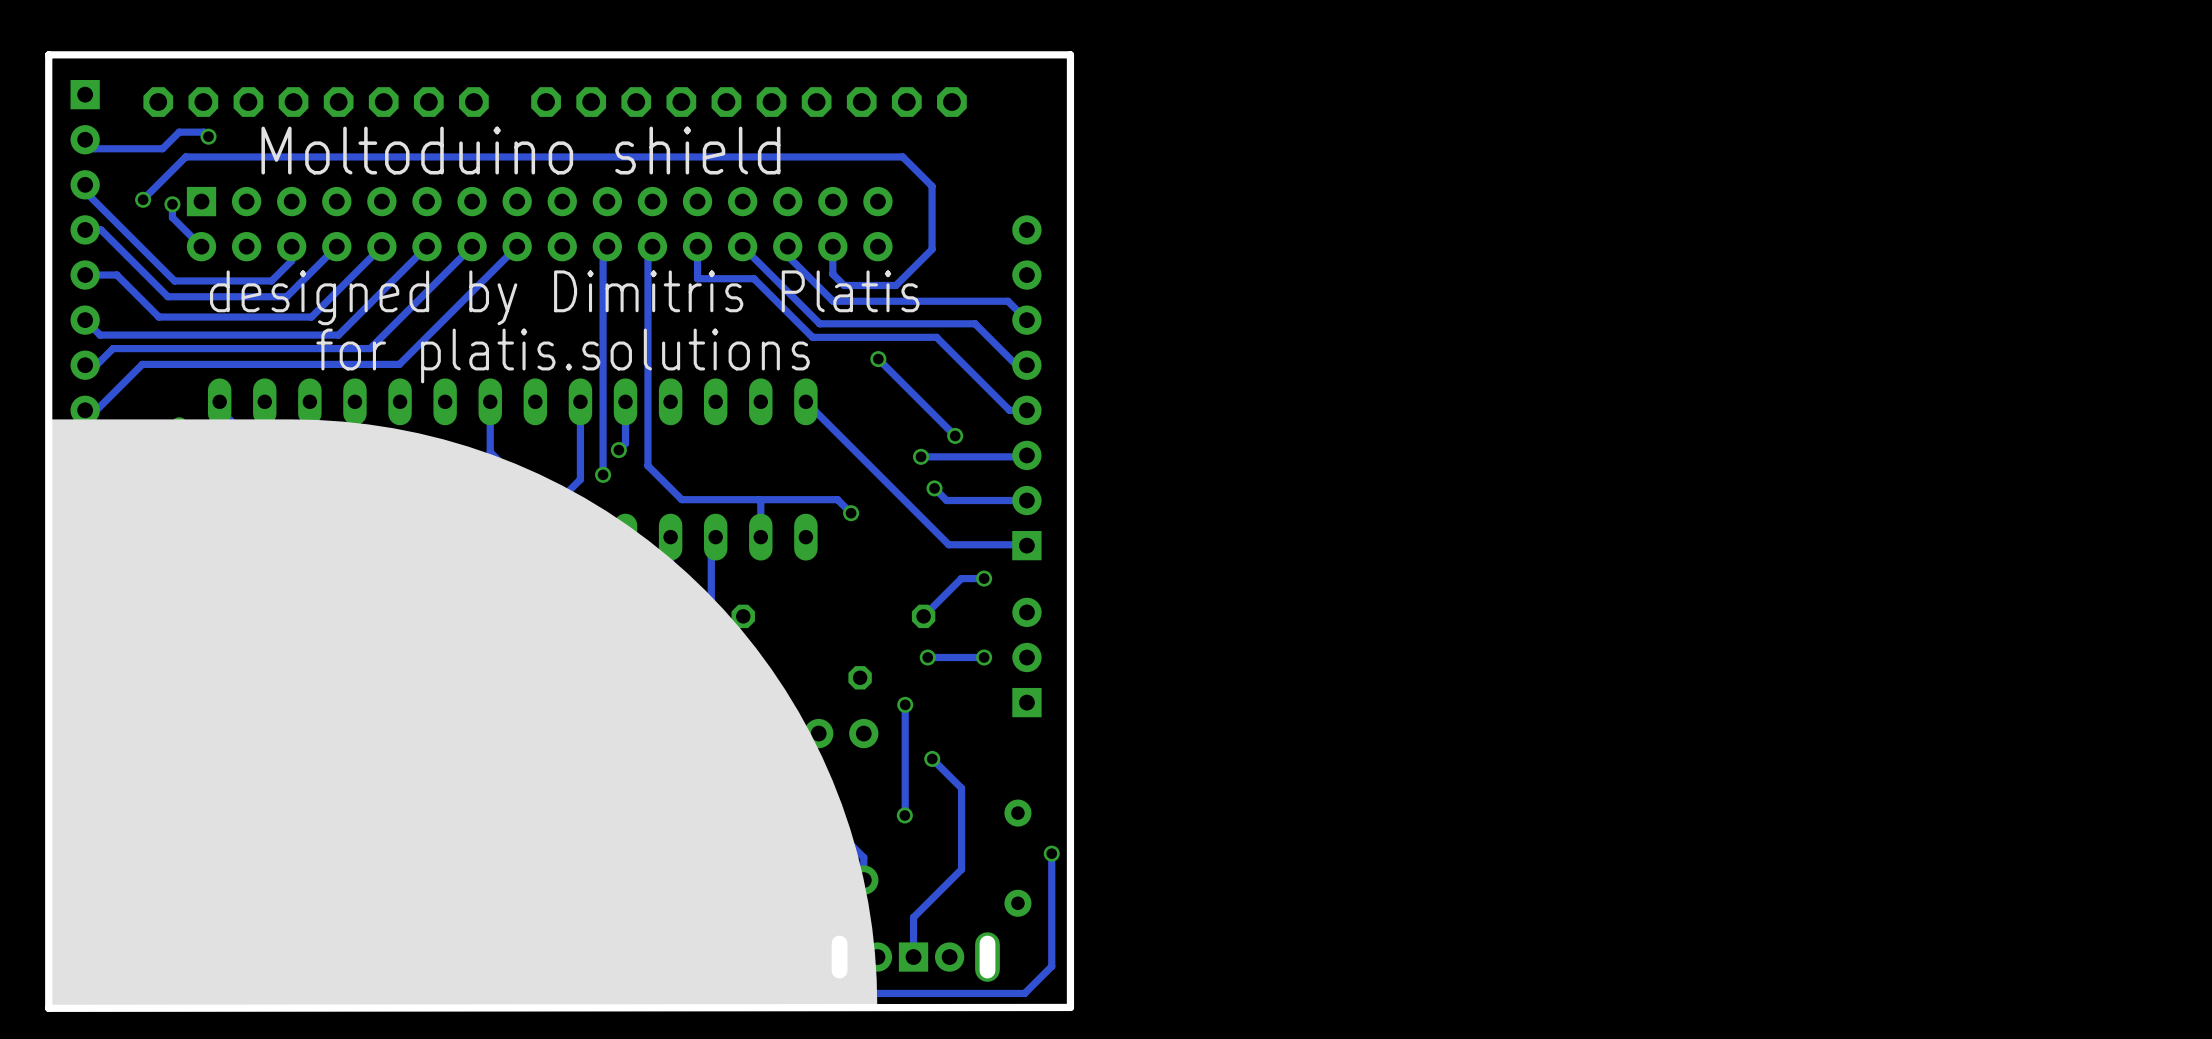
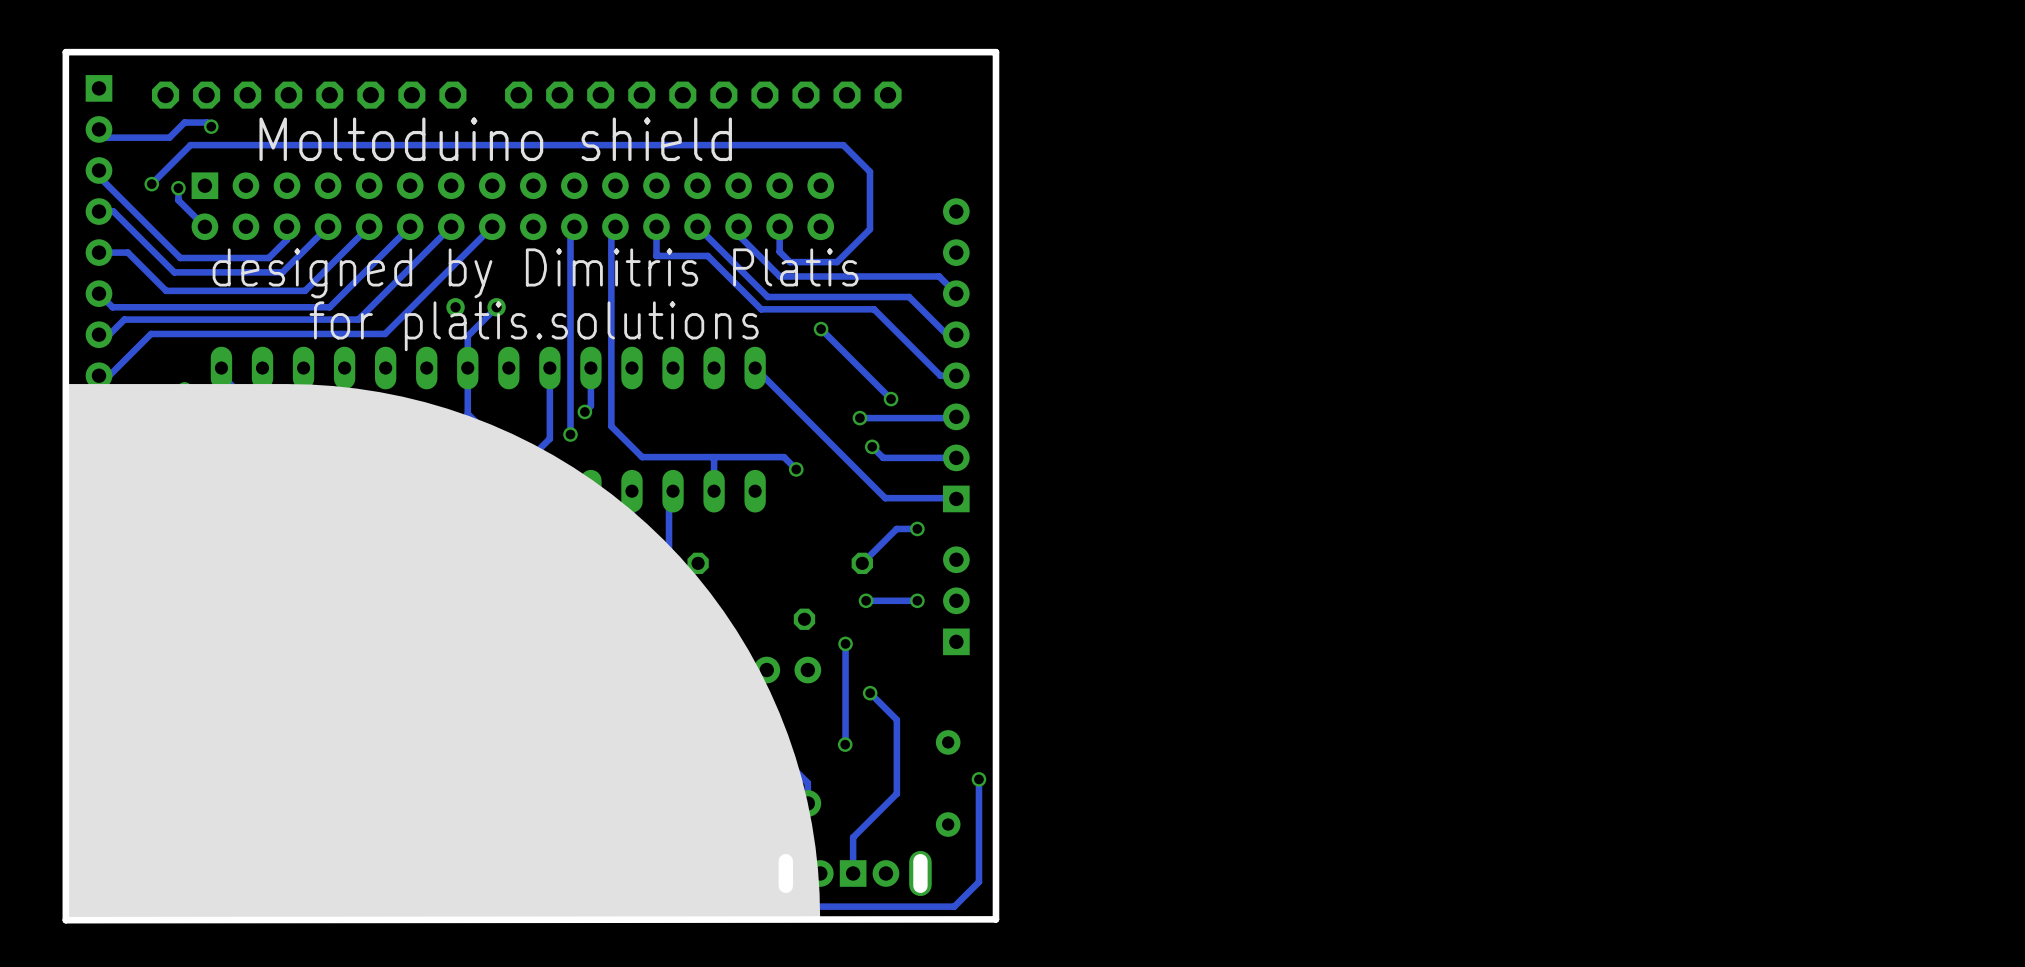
part: none -> (476, 307)
track: none -> (496, 307) (467, 336) (467, 368)

